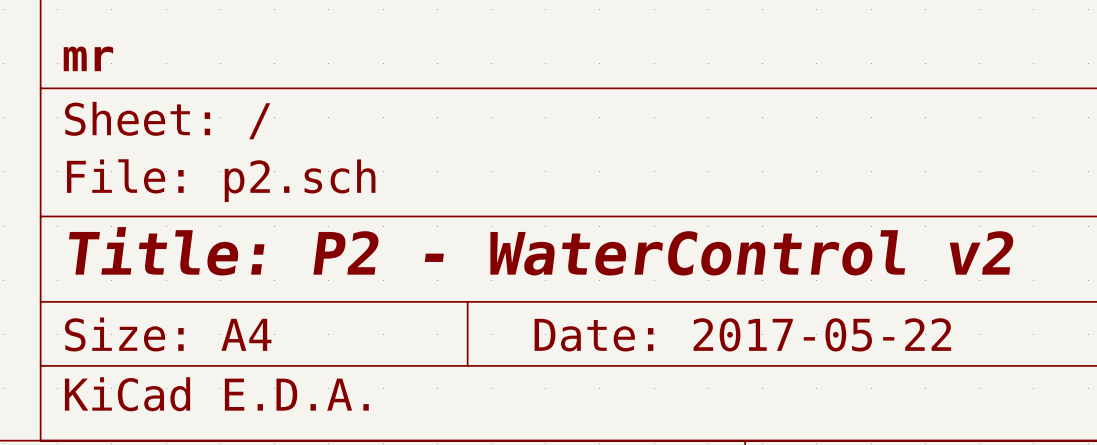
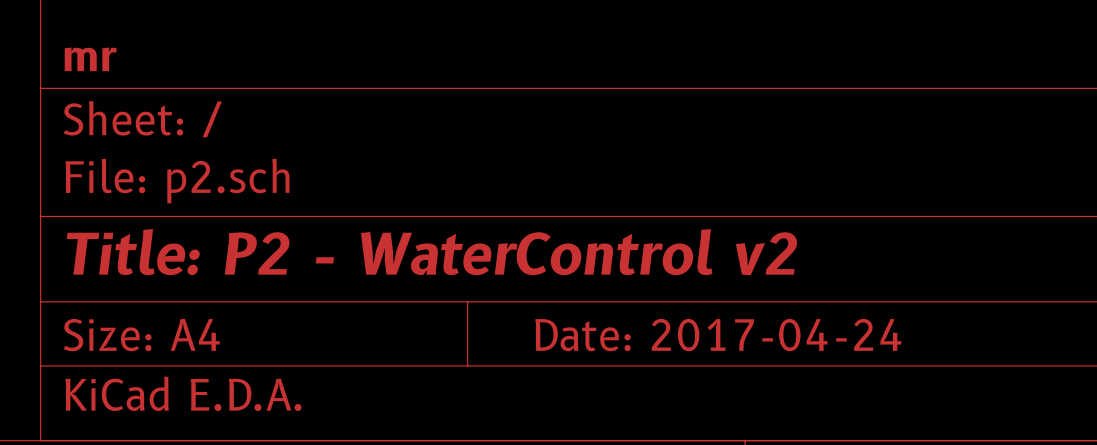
title block: Date: 2017-05-22 (742, 334) -> Date: 2017-04-24 (718, 335)

